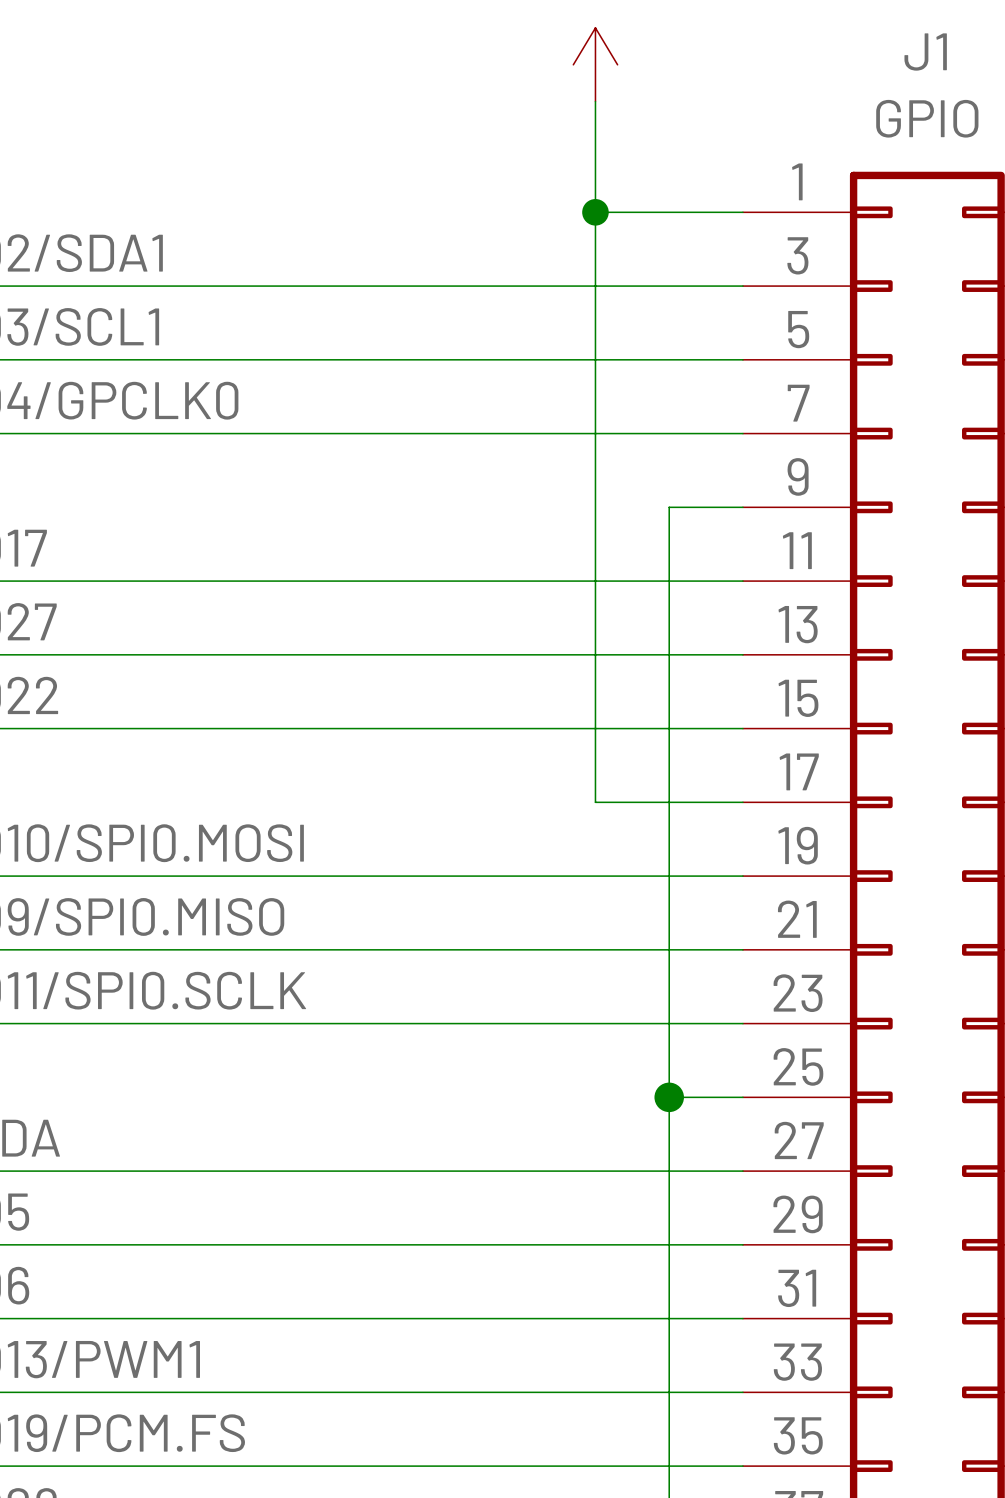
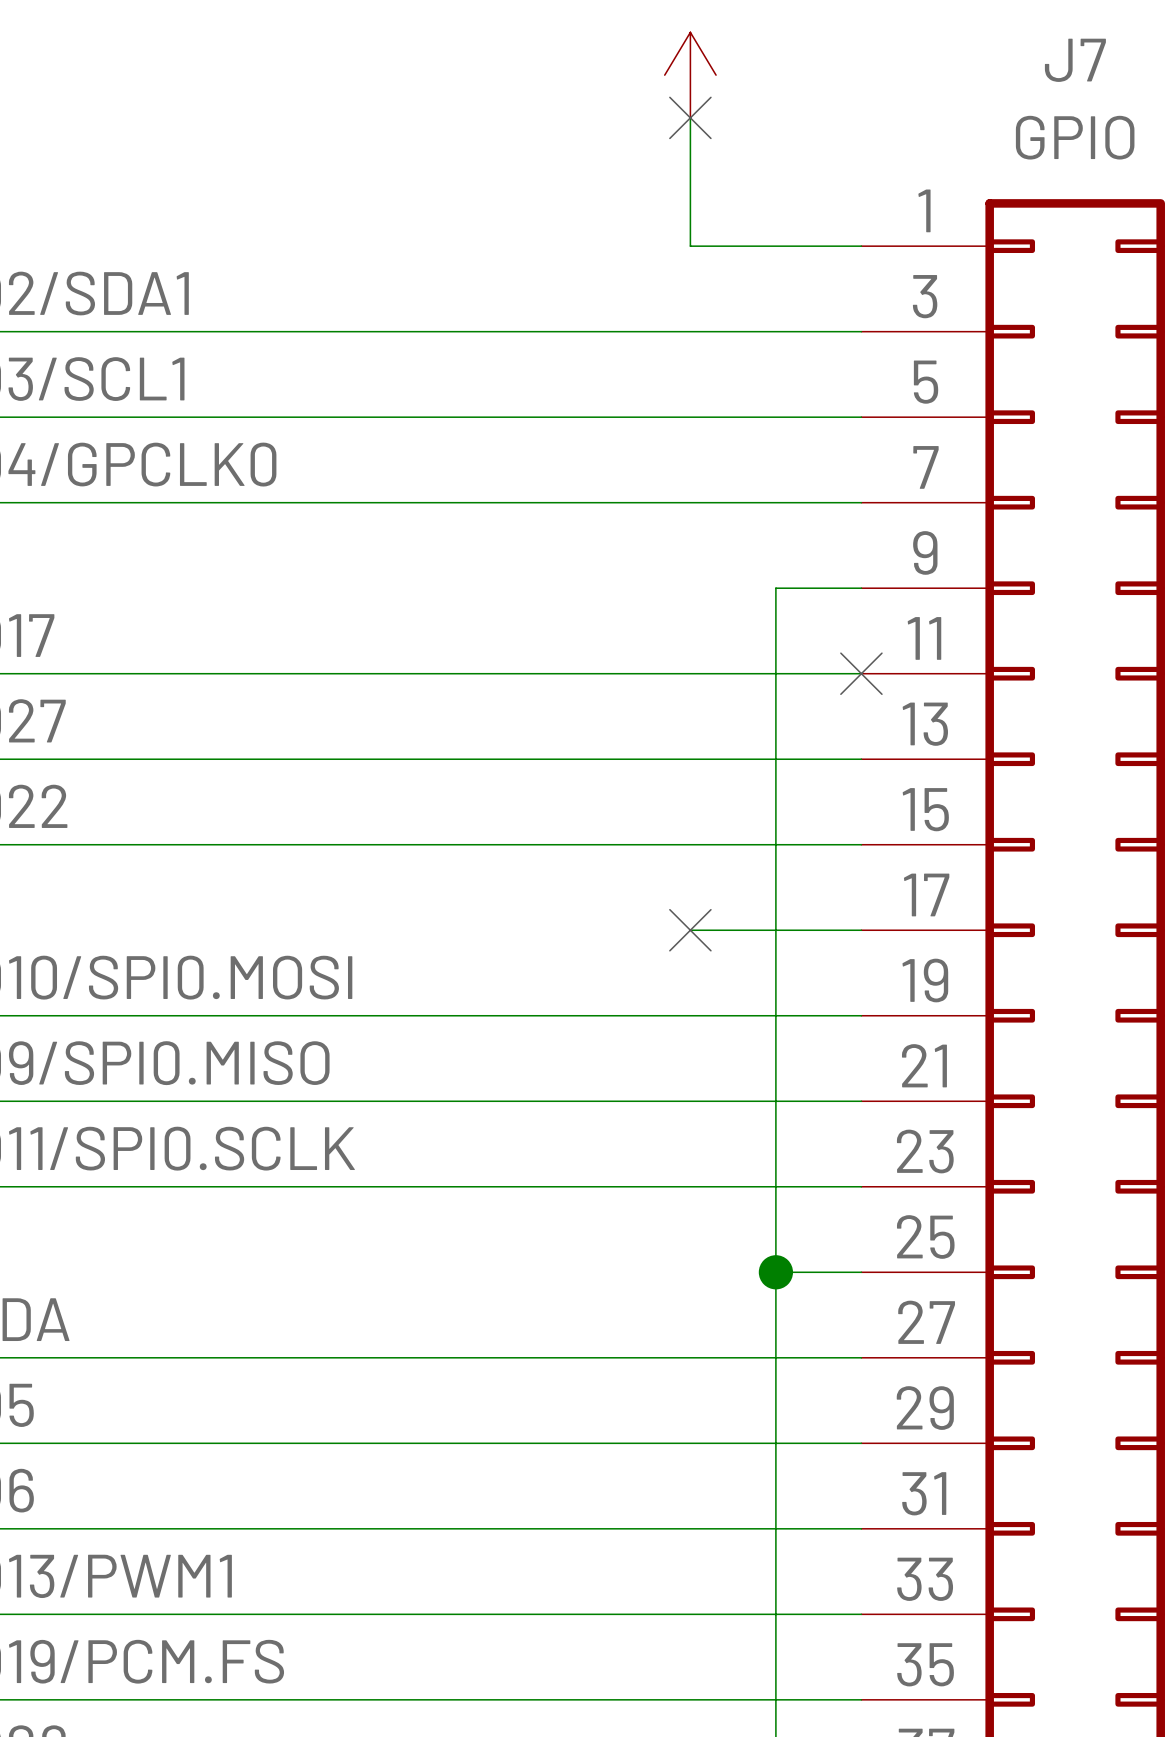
J1 name: J1 (925, 52) -> J7 (1075, 60)
no-connect mark: none -> (690, 117)
wire: (595, 212) (595, 802) -> none
junction: (595, 212) -> none
no-connect mark: none -> (861, 673)
no-connect mark: none -> (690, 930)

